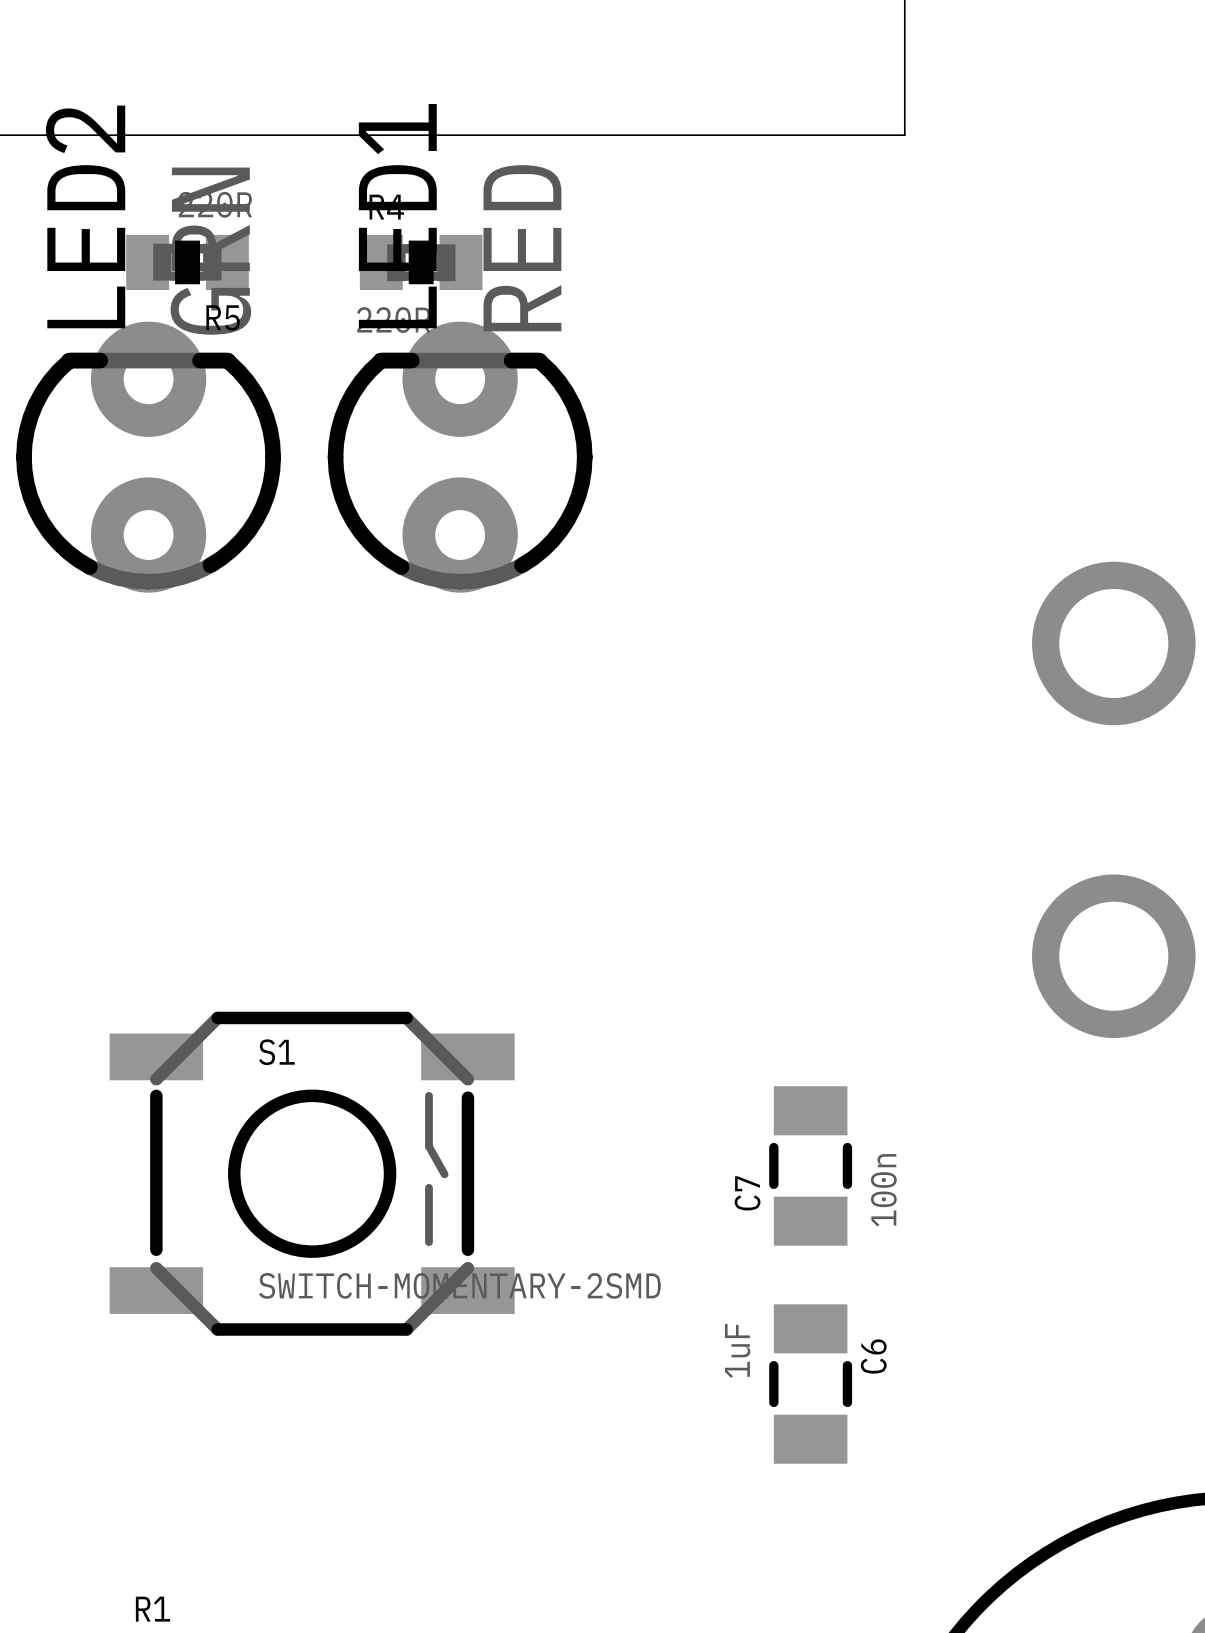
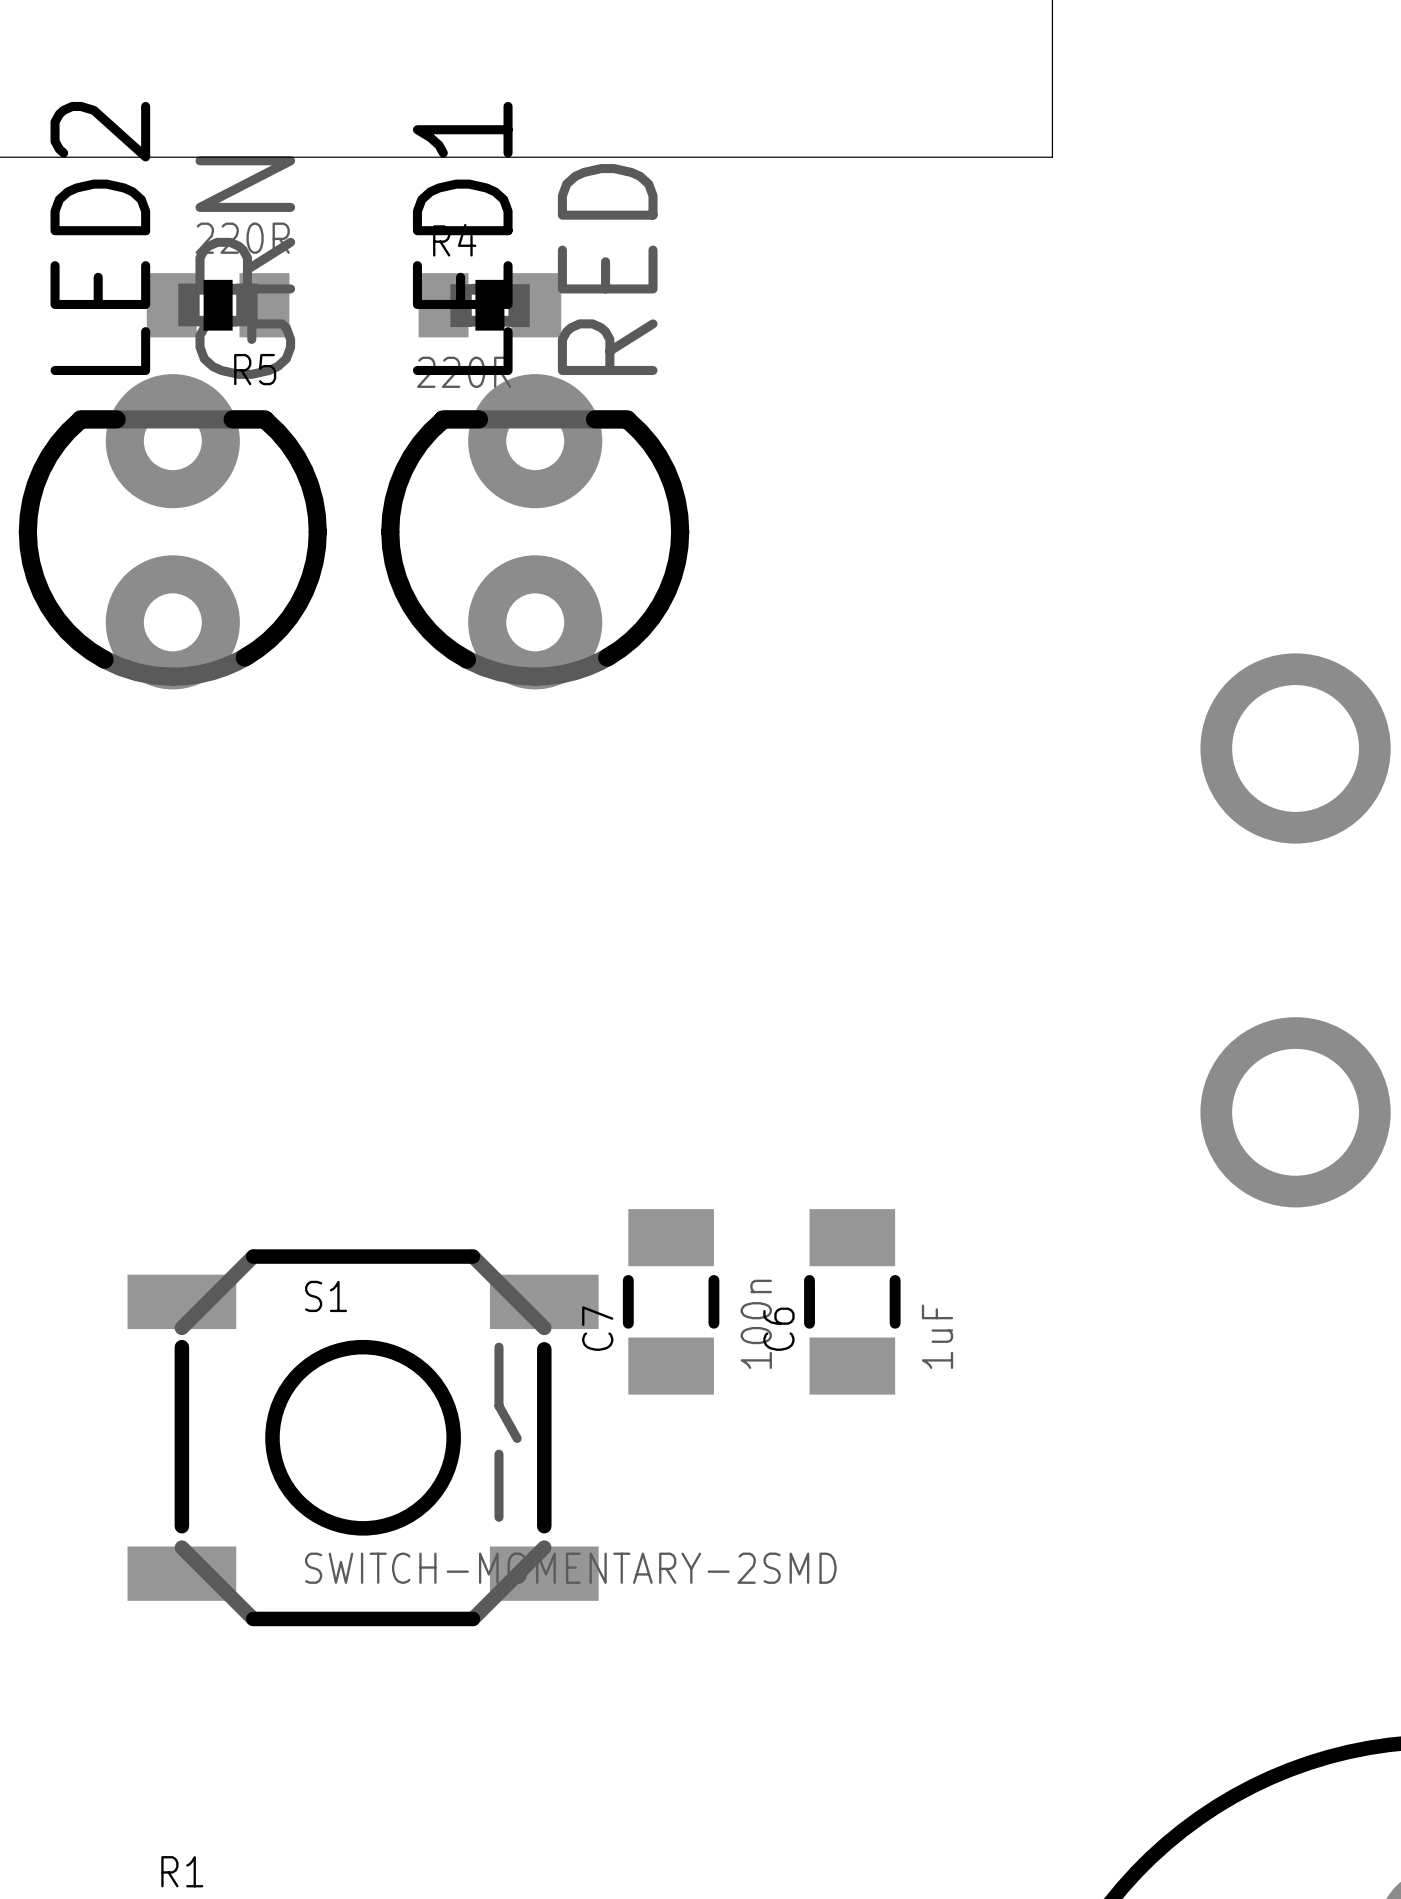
C7 position: (810, 1165) -> (671, 1301)
S1 position: (312, 1173) -> (363, 1437)
C6 value position: 1uF (737, 1350) -> 1uF (937, 1336)
C6 name position: C6 (873, 1356) -> C6 (778, 1329)
C6 position: (810, 1384) -> (852, 1301)

